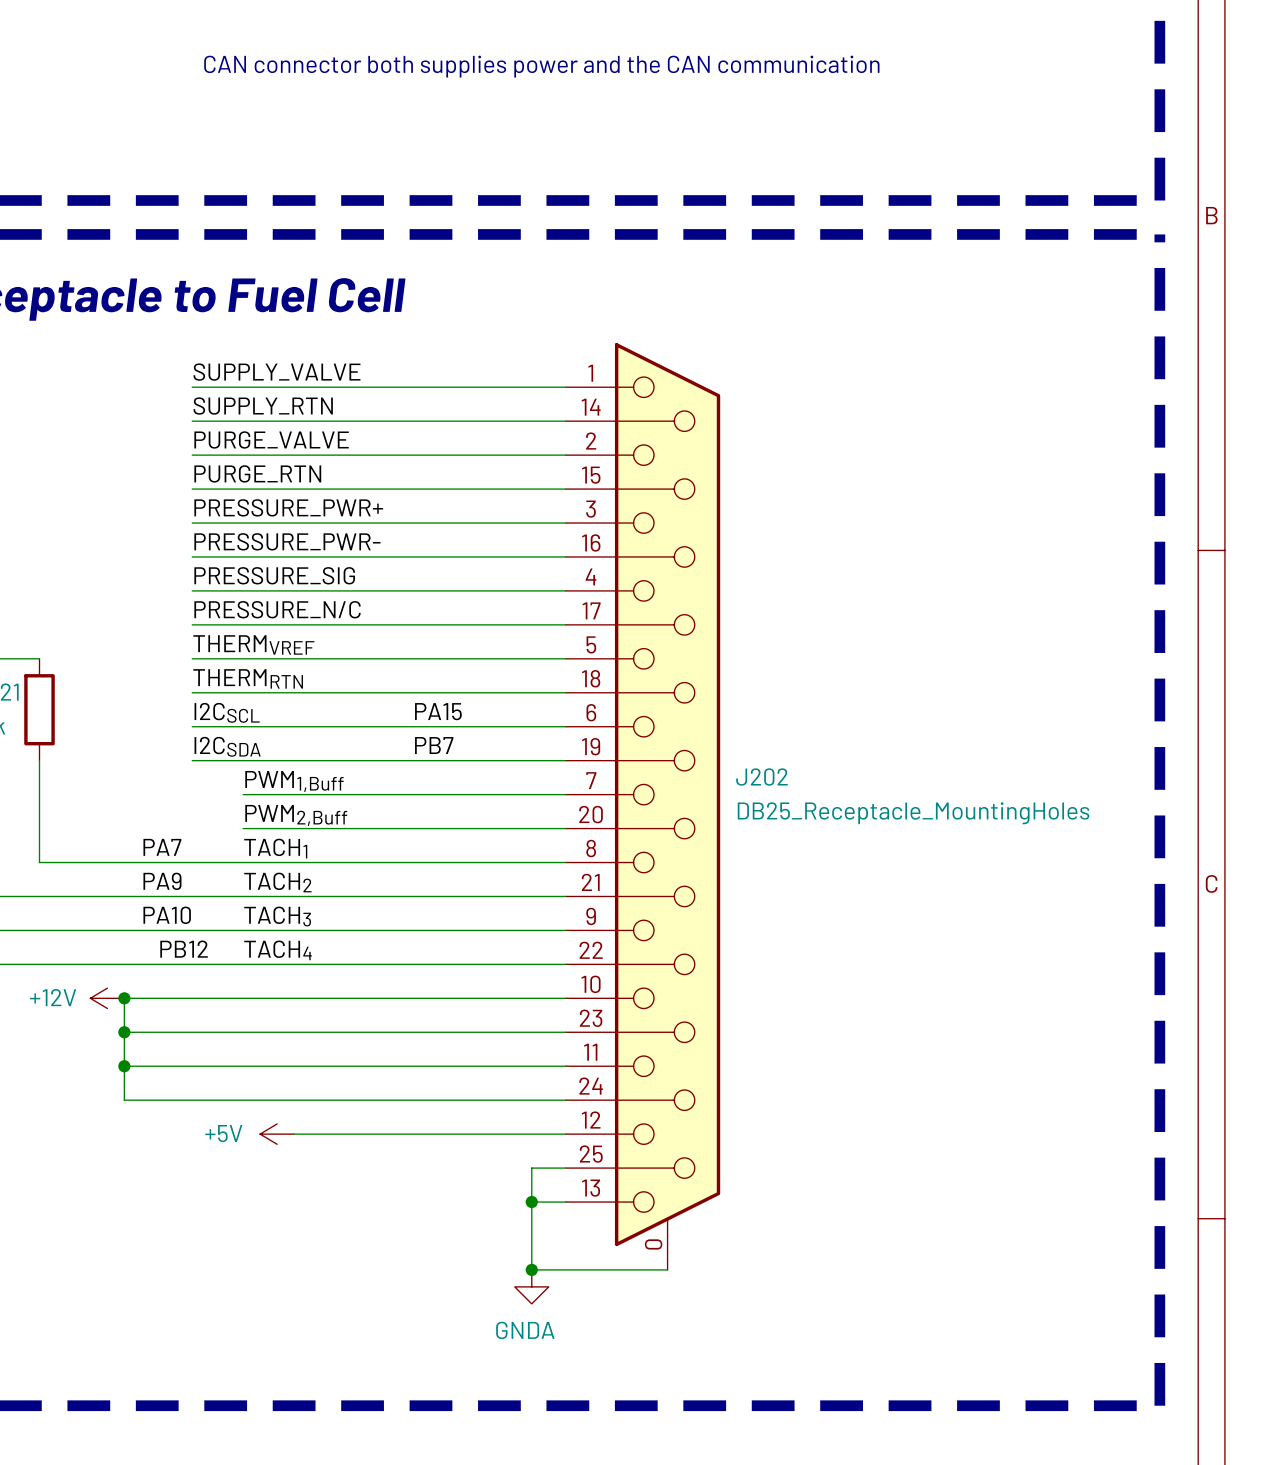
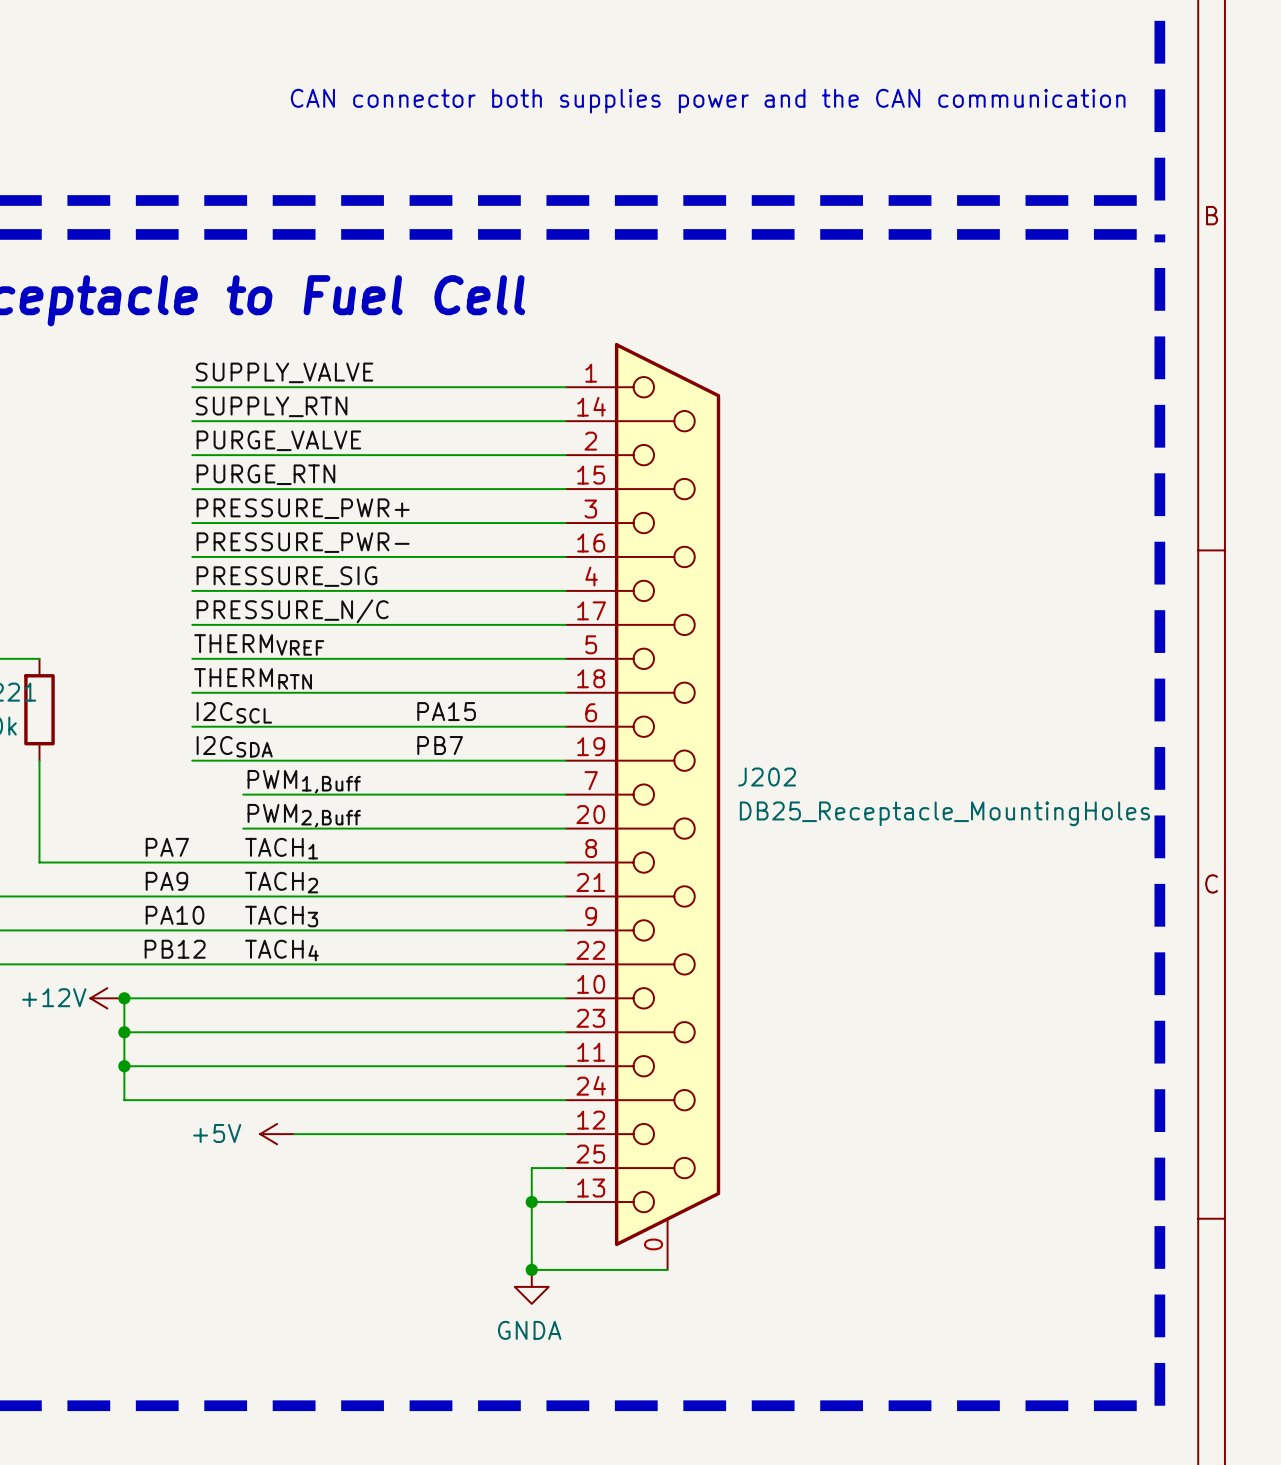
text position: CAN connector both supplies power and the CAN communication (541, 66) -> CAN connector both supplies power and the CAN communication (708, 101)

